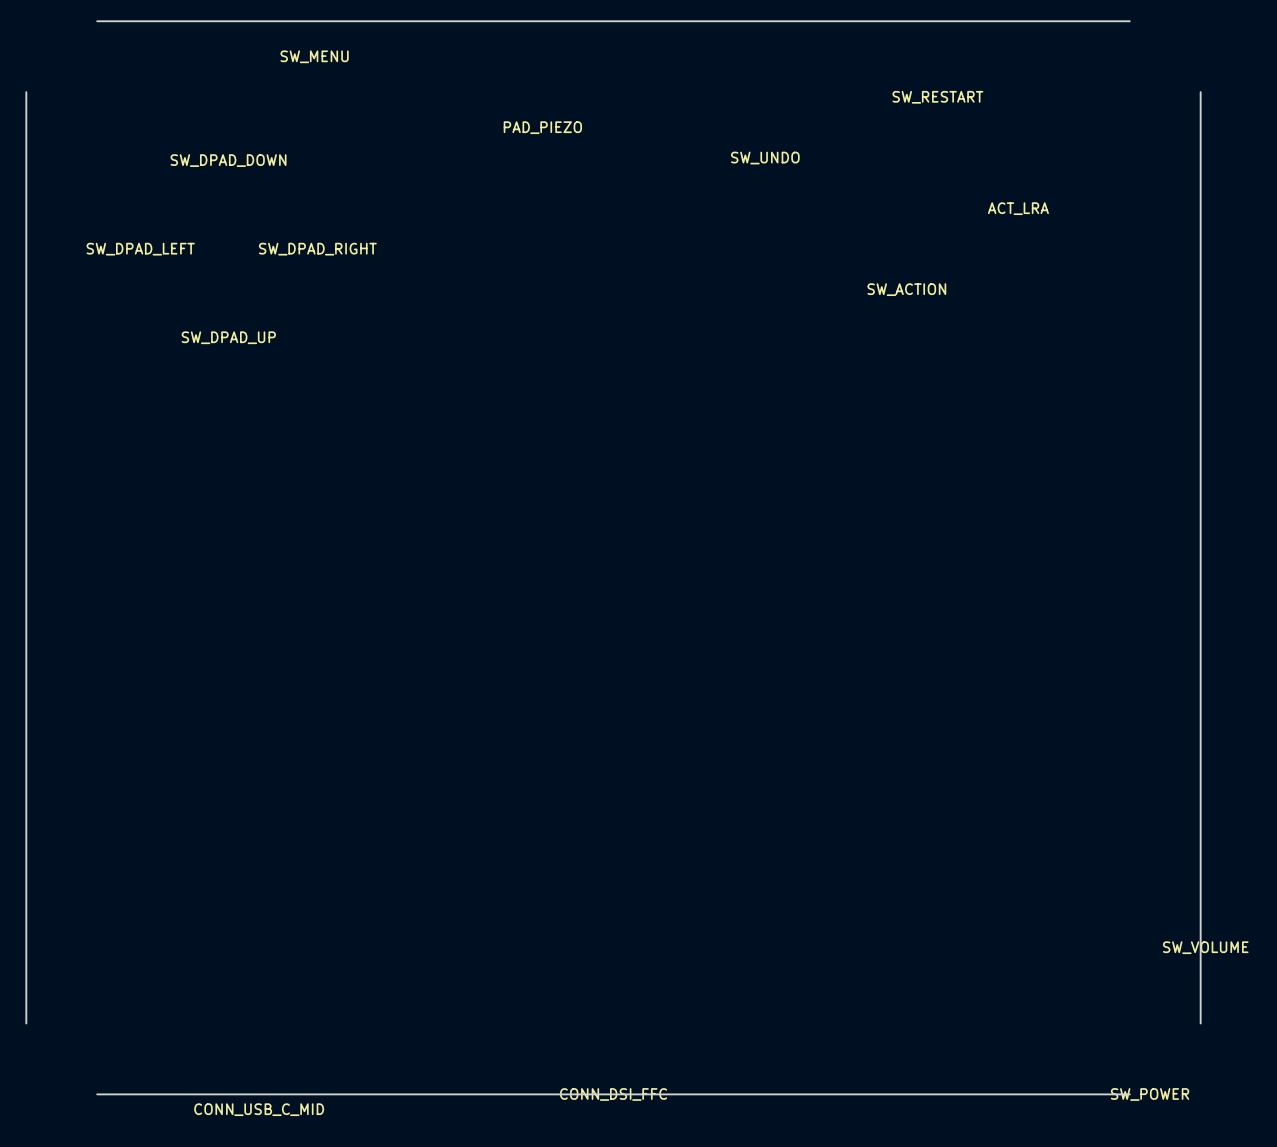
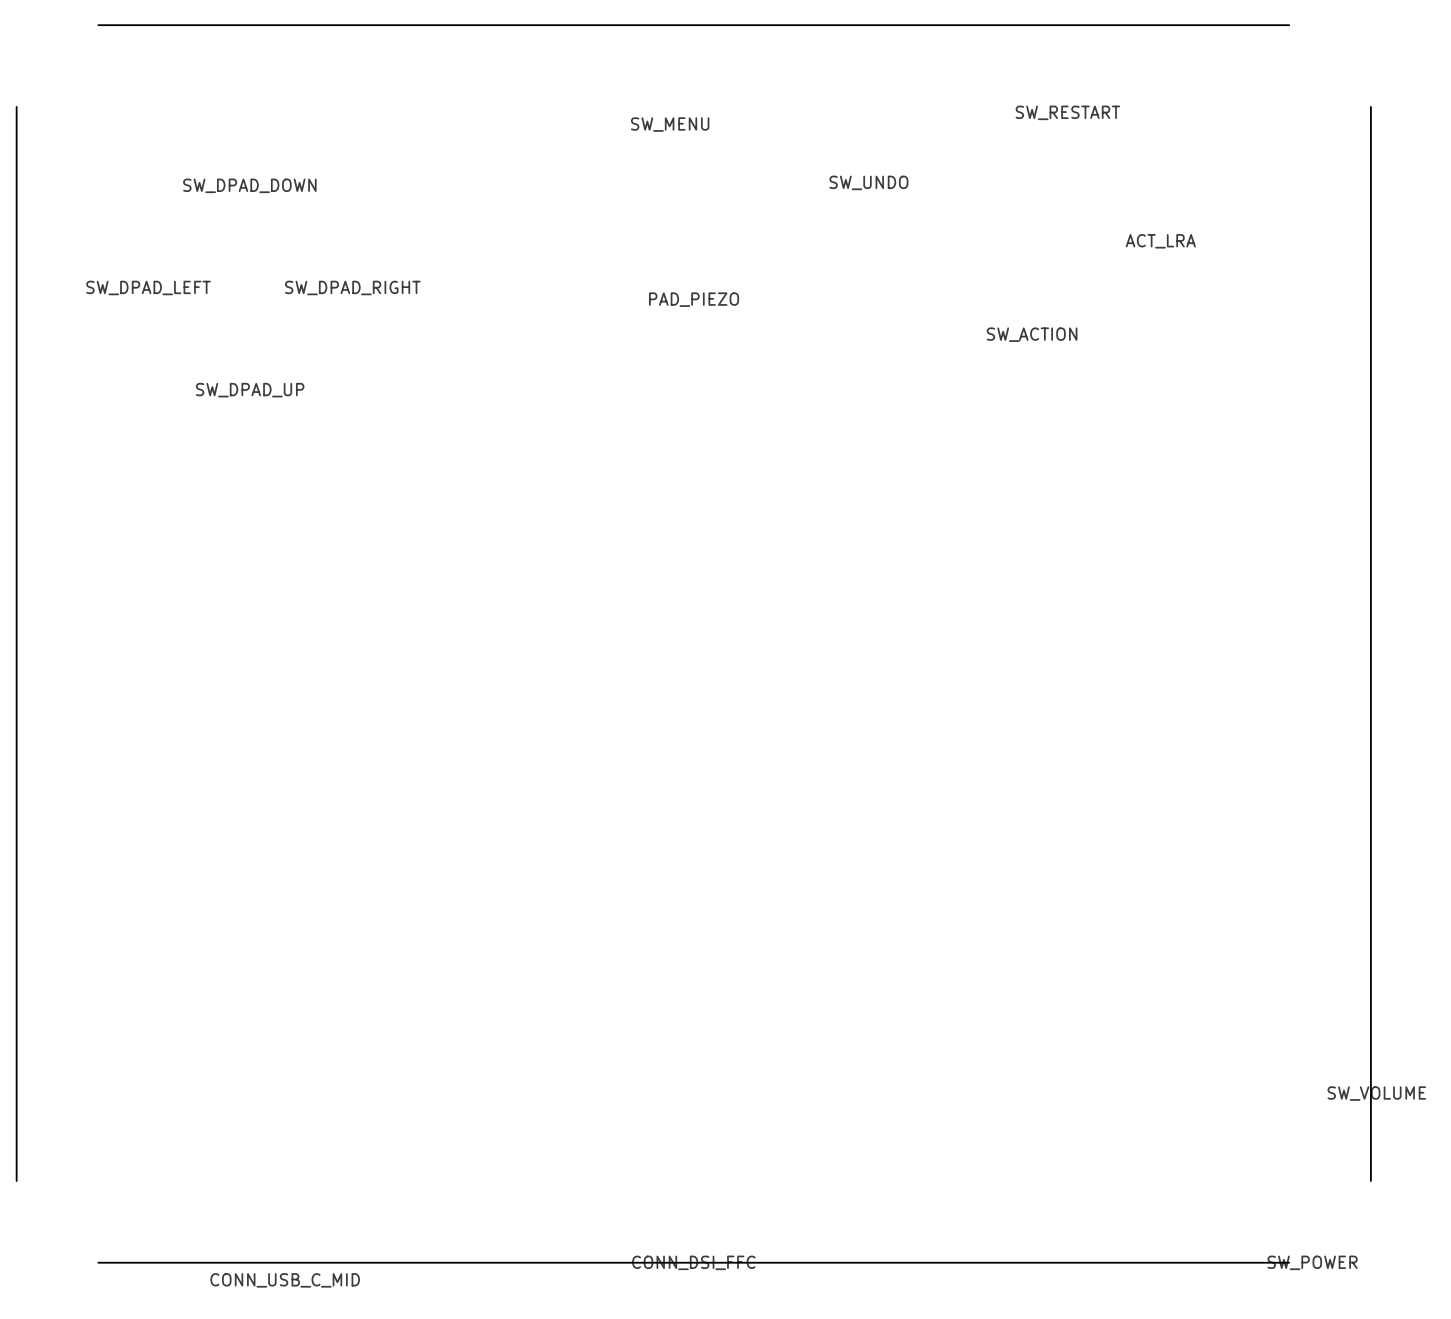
text: SW_MENU (314, 56) -> none
text: none -> SW_MENU (670, 124)
text position: PAD_PIEZO (542, 127) -> PAD_PIEZO (694, 299)

